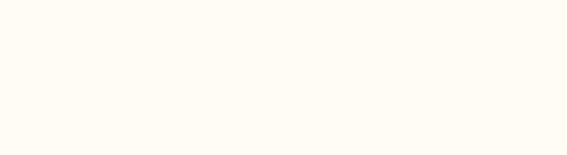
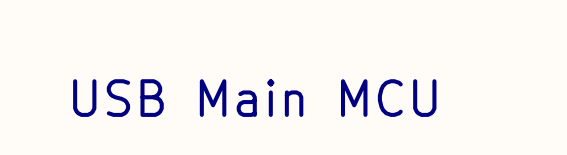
text: none -> USB Main MCU (254, 98)

